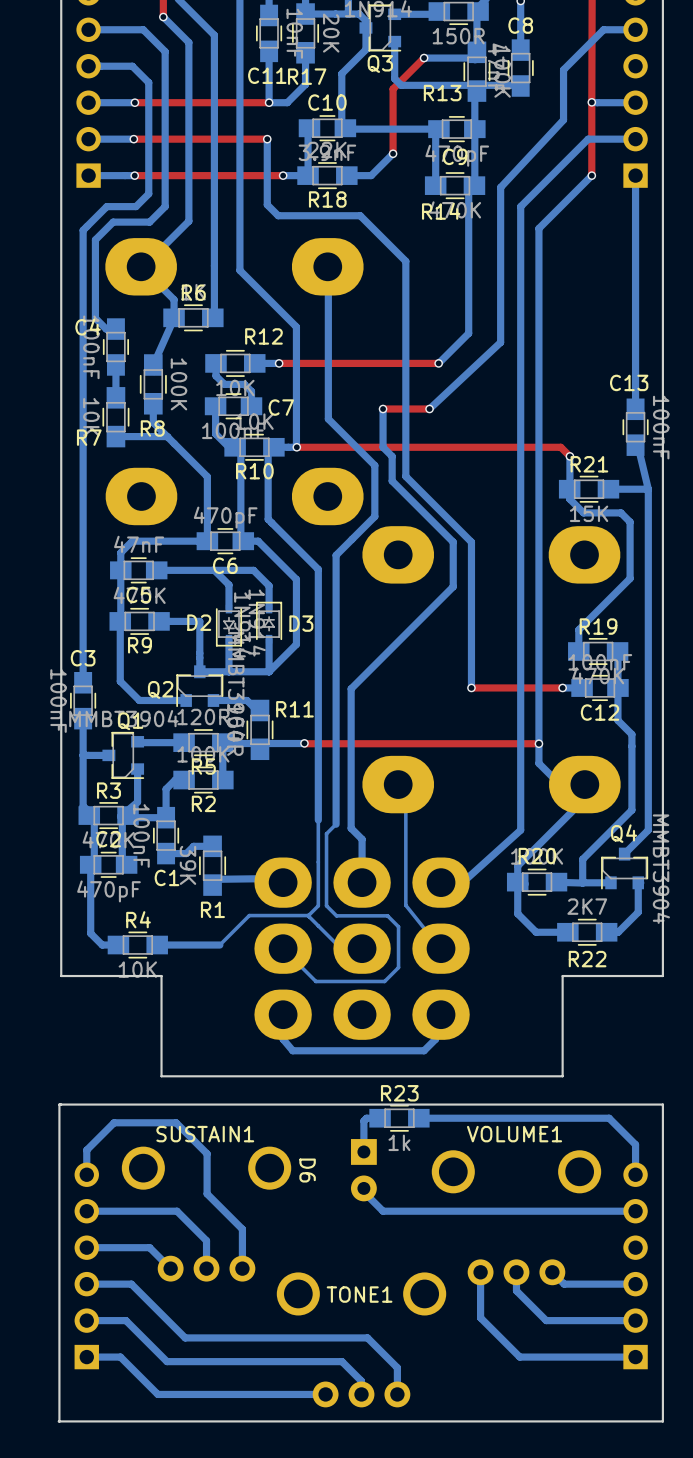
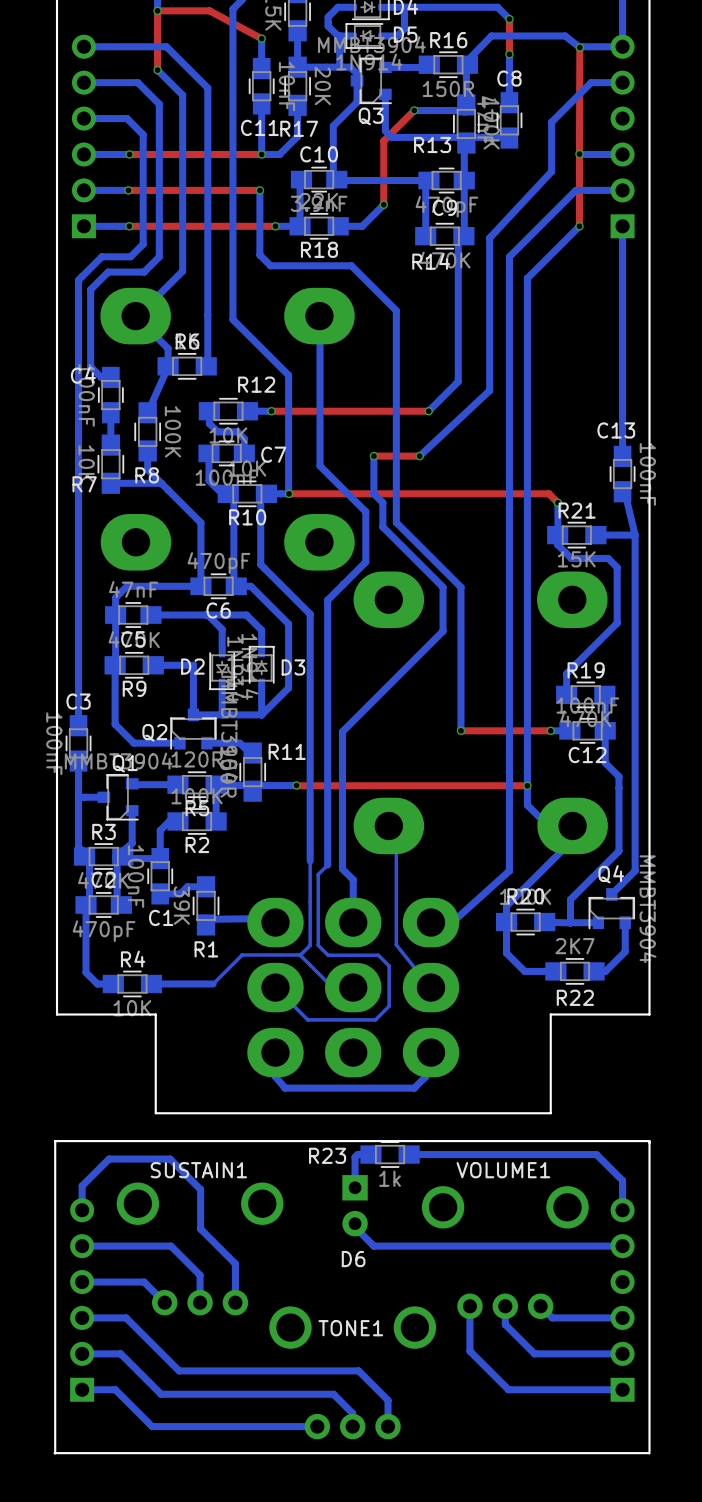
R23 name position: R23 (399, 1093) -> R23 (327, 1155)
D6 name rotation: 0° (307, 1170) -> 90° counterclockwise (353, 1259)
D6 name position: D6 (307, 1170) -> D6 (353, 1259)

